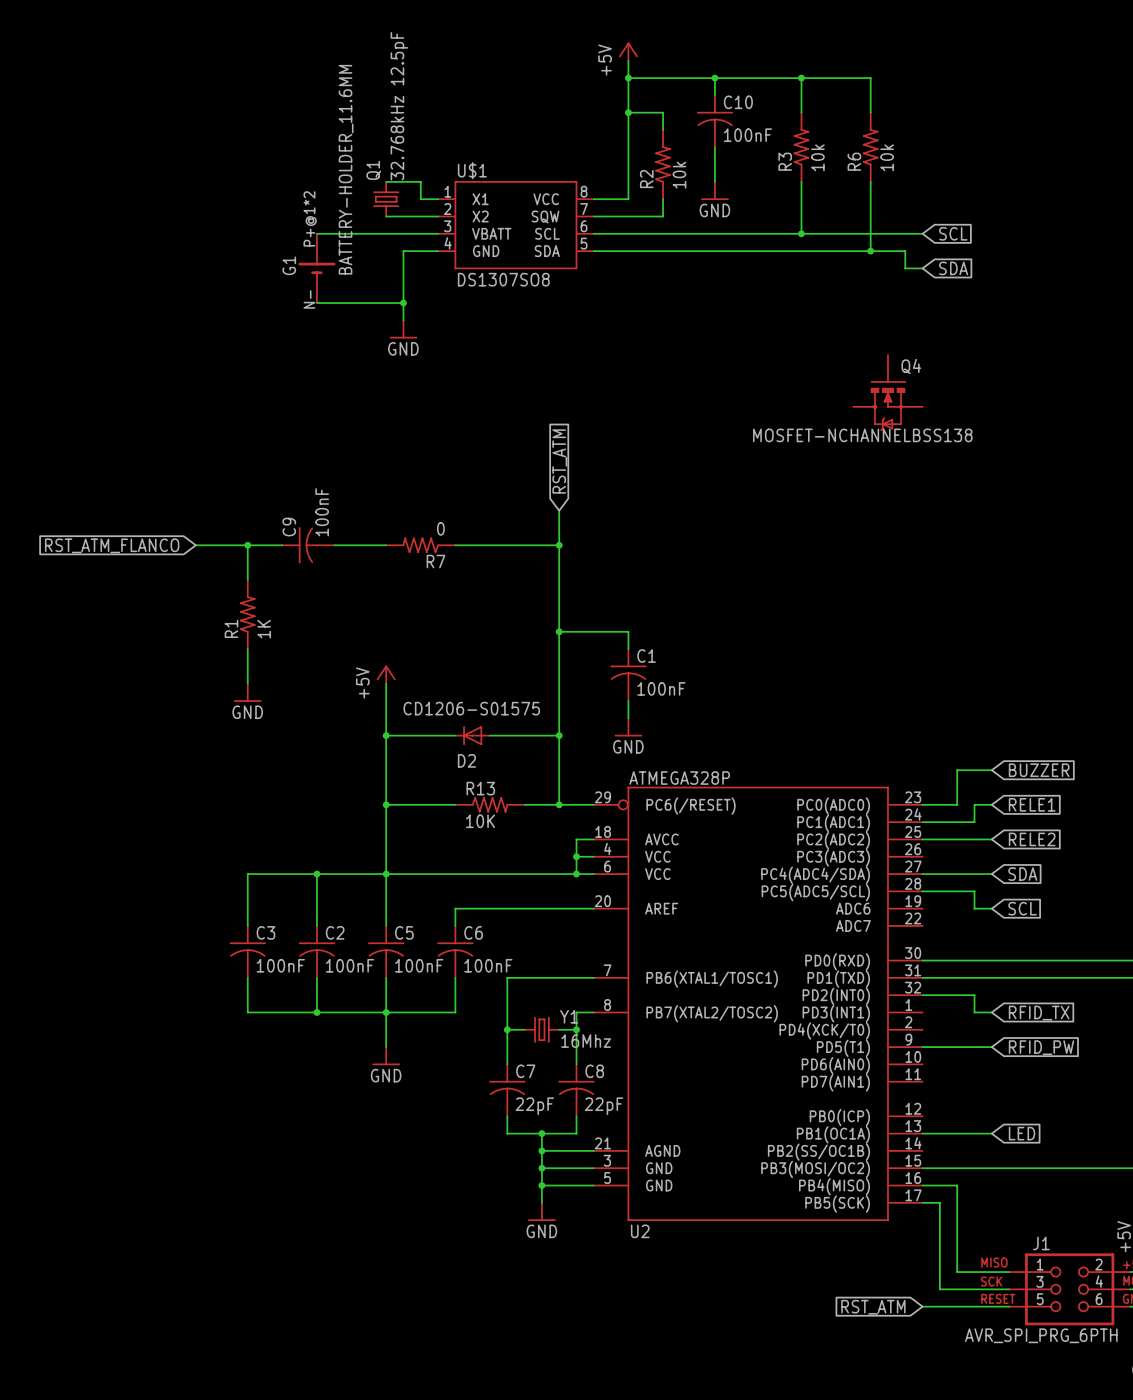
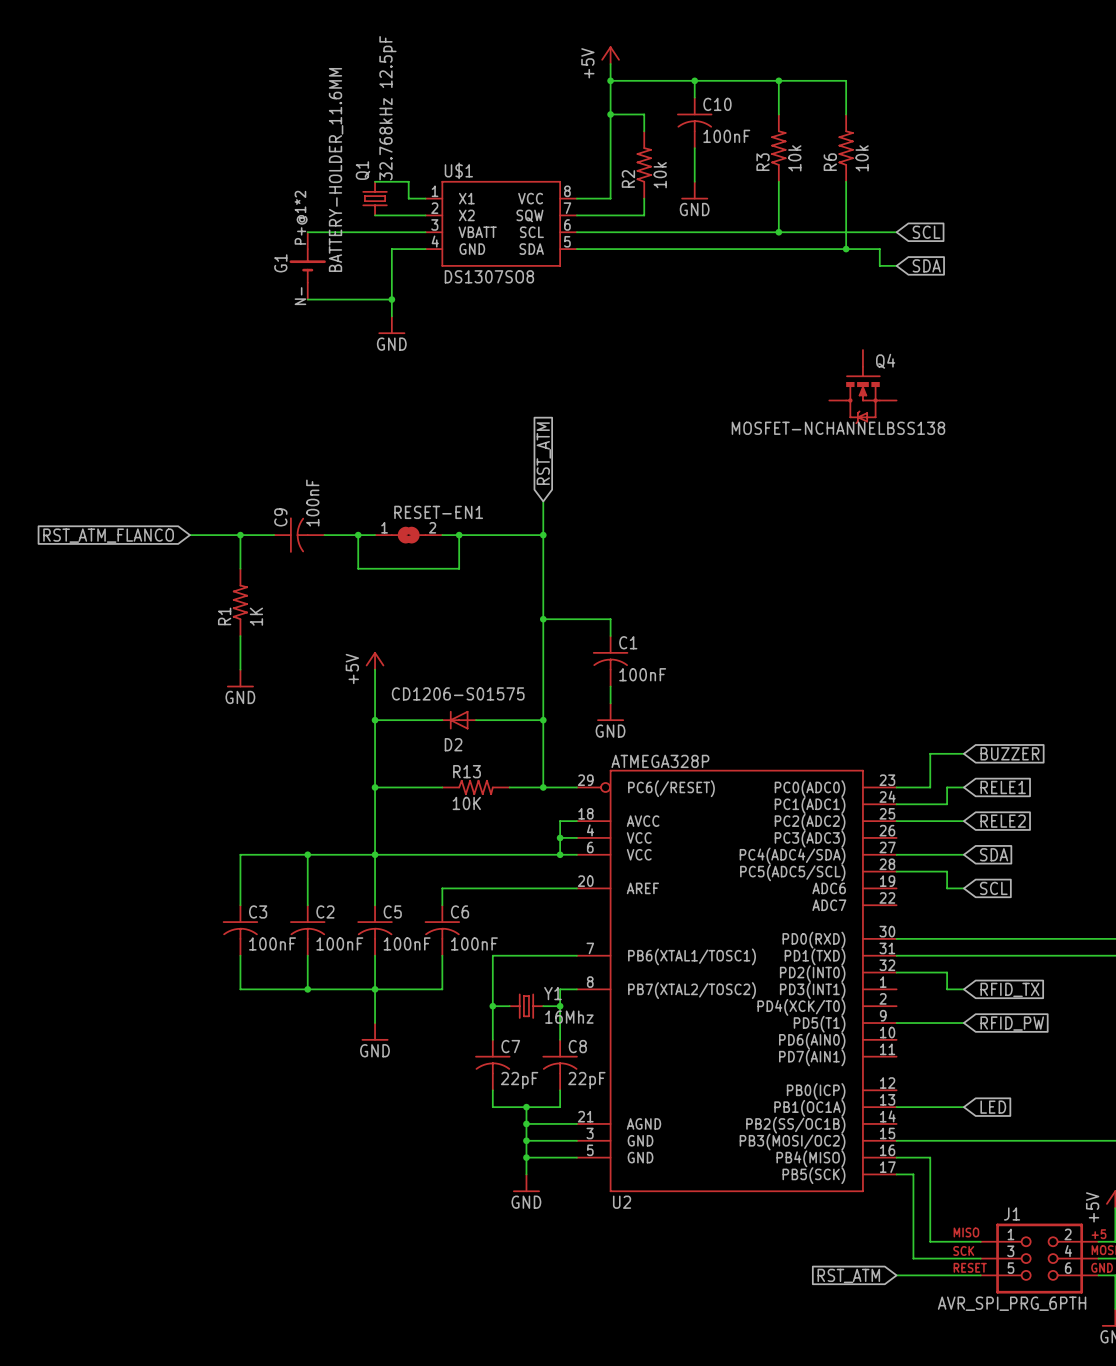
wire: none -> (358, 535) (358, 568) (459, 568) (459, 535)
junction: none -> (358, 535)
R7: 0 (420, 545) -> none
RESET-EN1: none -> (408, 535)
junction: none -> (459, 535)

